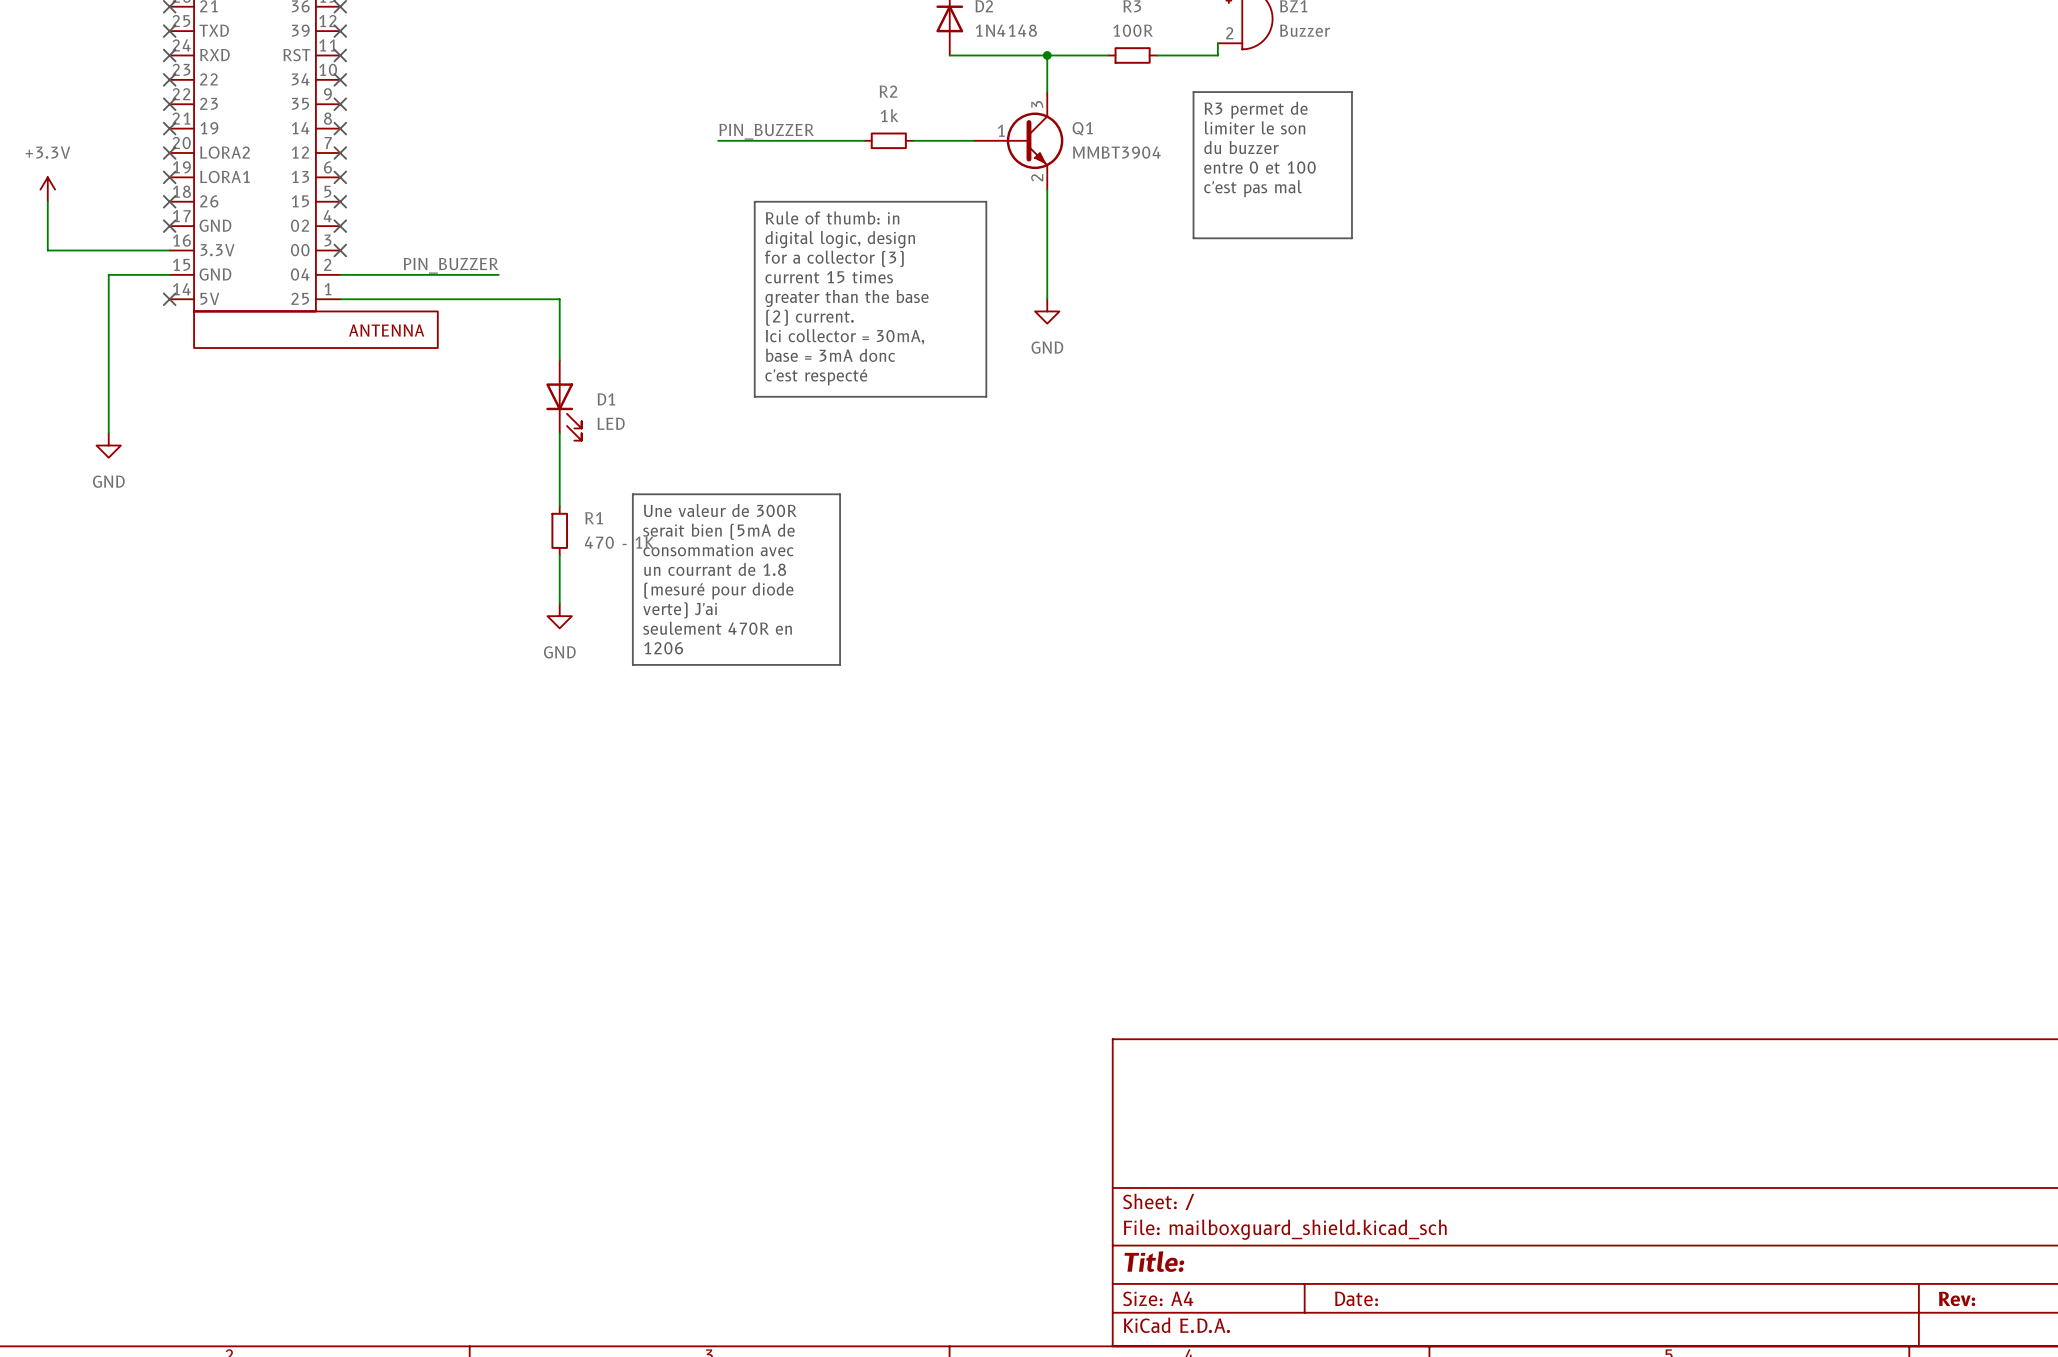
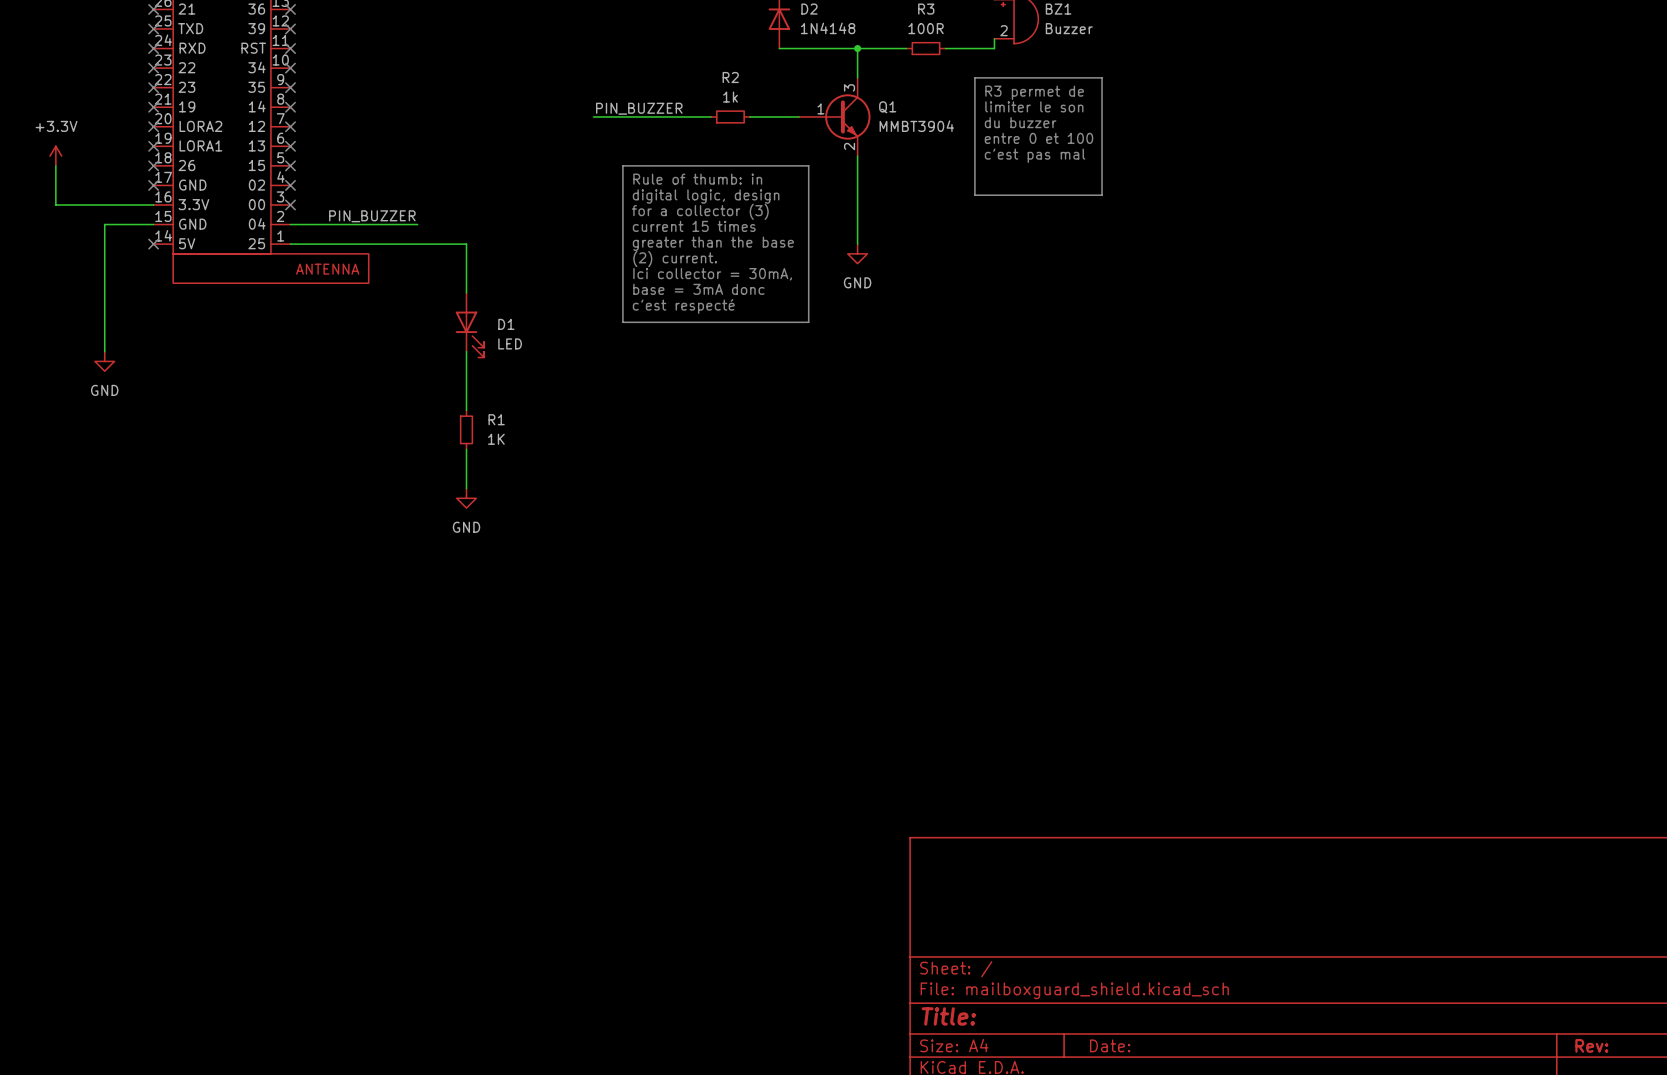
line: (632, 494) (840, 494) (840, 664) (632, 664) (632, 494) -> none
text: Une valeur de 300R (720, 510) -> none
text: serait bien (5mA de (718, 531) -> none
R1 value: 470 - 1K (619, 542) -> 1K (496, 439)
text: consommation avec (718, 550) -> none
text: un courrant de 1.8 (715, 569) -> none
text: (mesuré pour diode (718, 590) -> none
text: verte) J'ai (680, 610) -> none
text: seulement 470R en (717, 628) -> none
text: 1206 (663, 648) -> none

